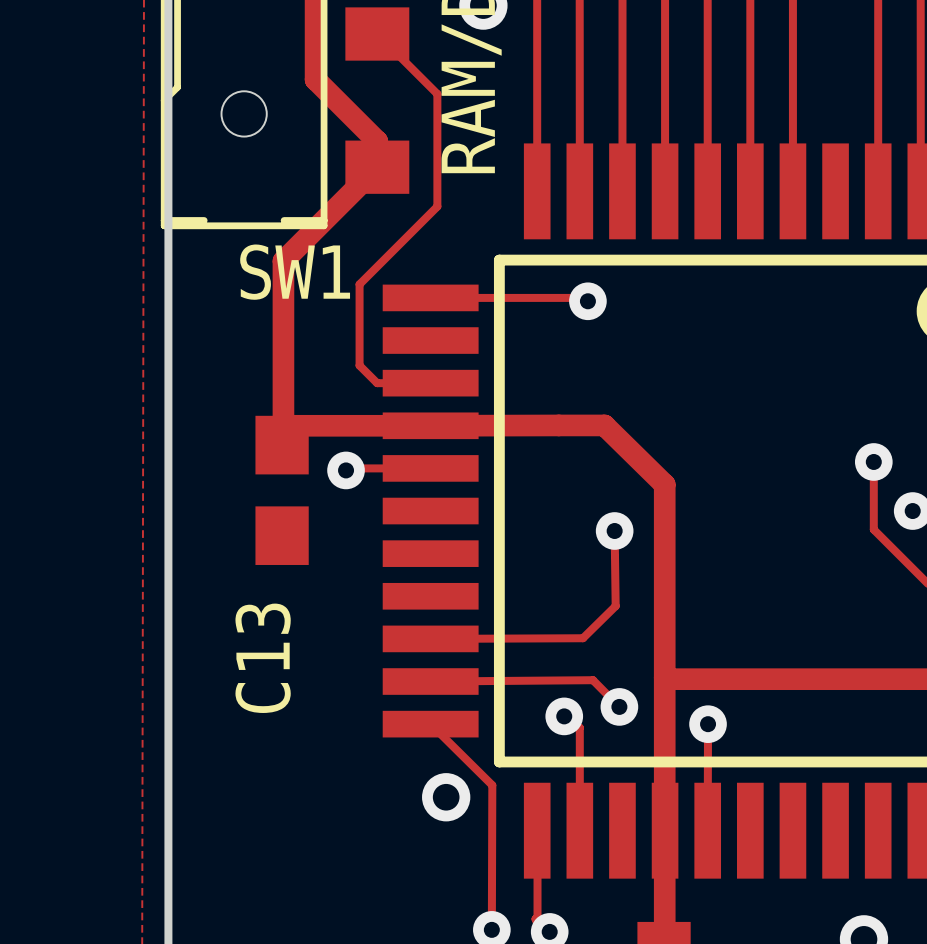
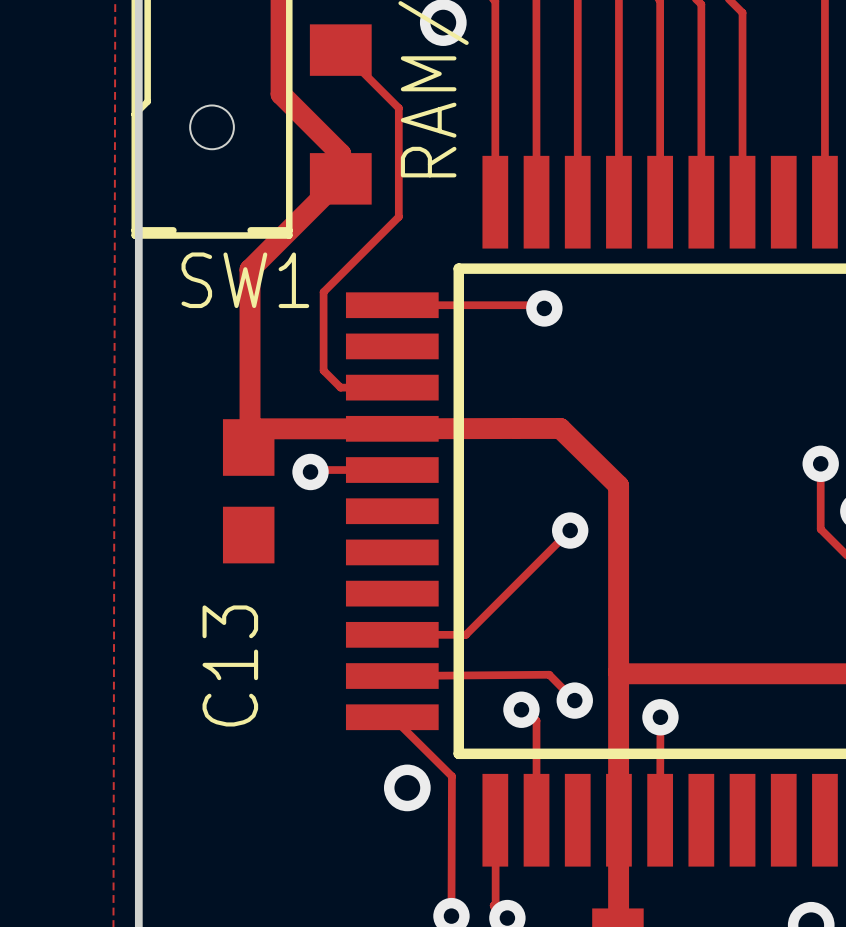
track: (614, 530) (615, 606) (582, 638) (430, 638) -> (570, 530) (465, 634) (392, 634)

